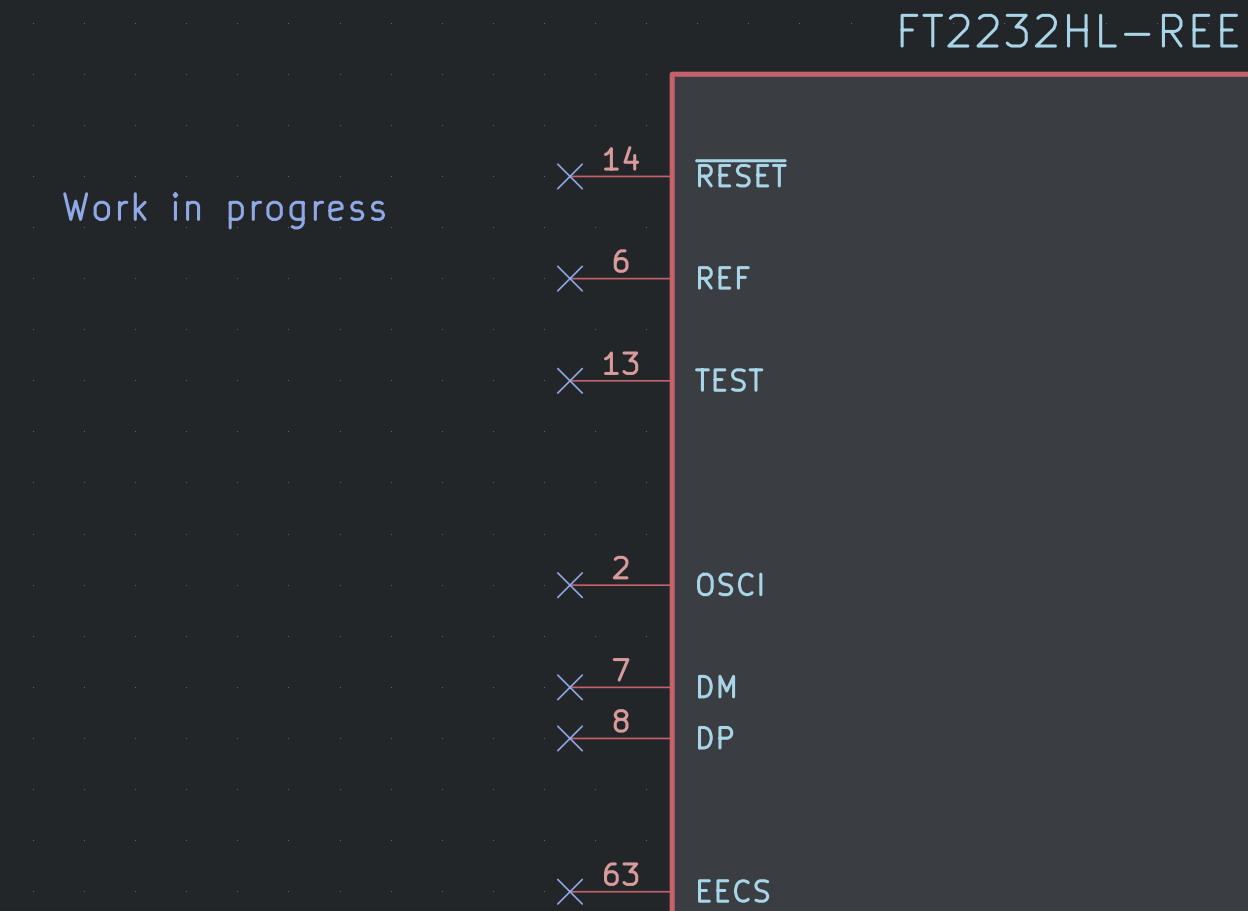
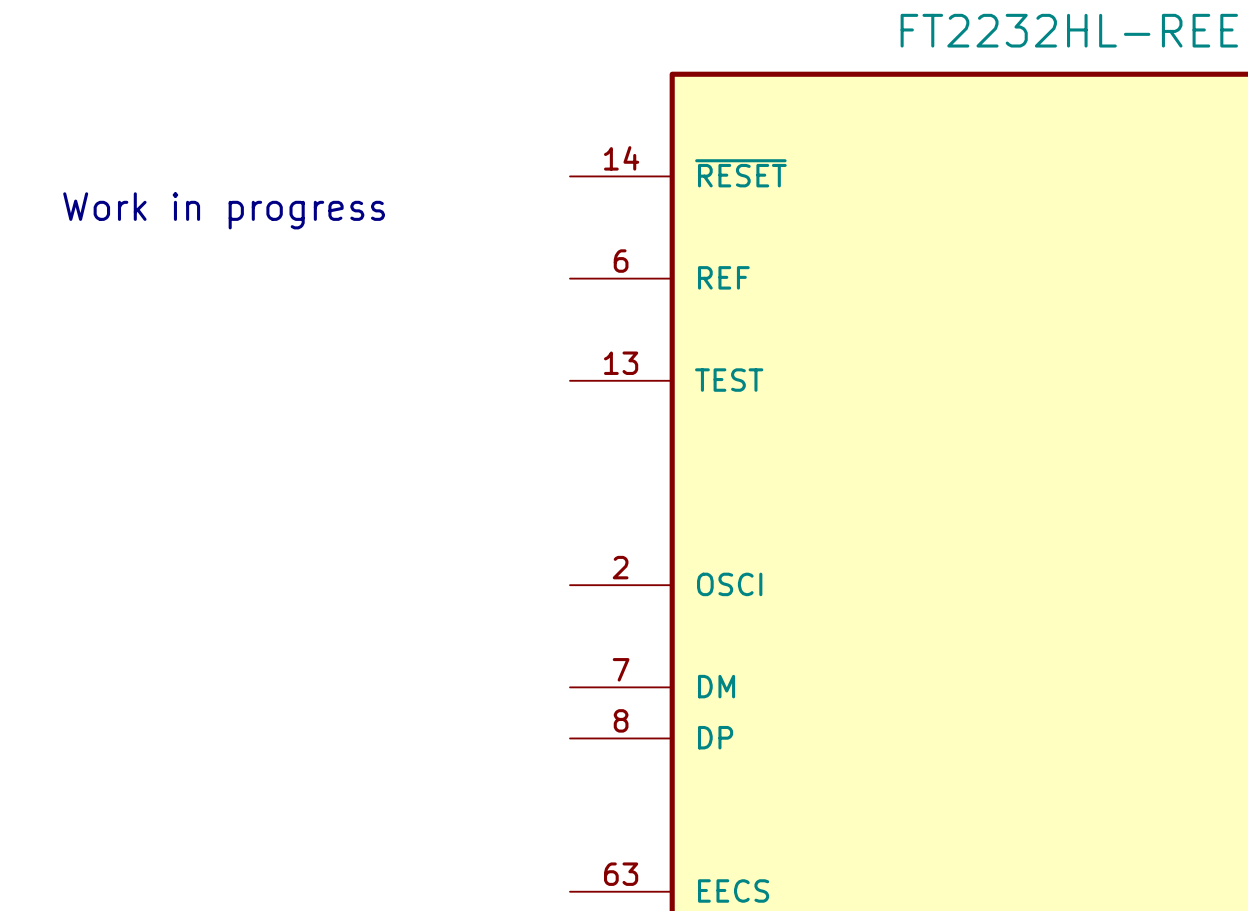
no-connect mark: (570, 176) -> none
no-connect mark: (570, 278) -> none
no-connect mark: (570, 380) -> none
no-connect mark: (570, 585) -> none
no-connect mark: (570, 687) -> none
no-connect mark: (570, 738) -> none
no-connect mark: (570, 891) -> none

